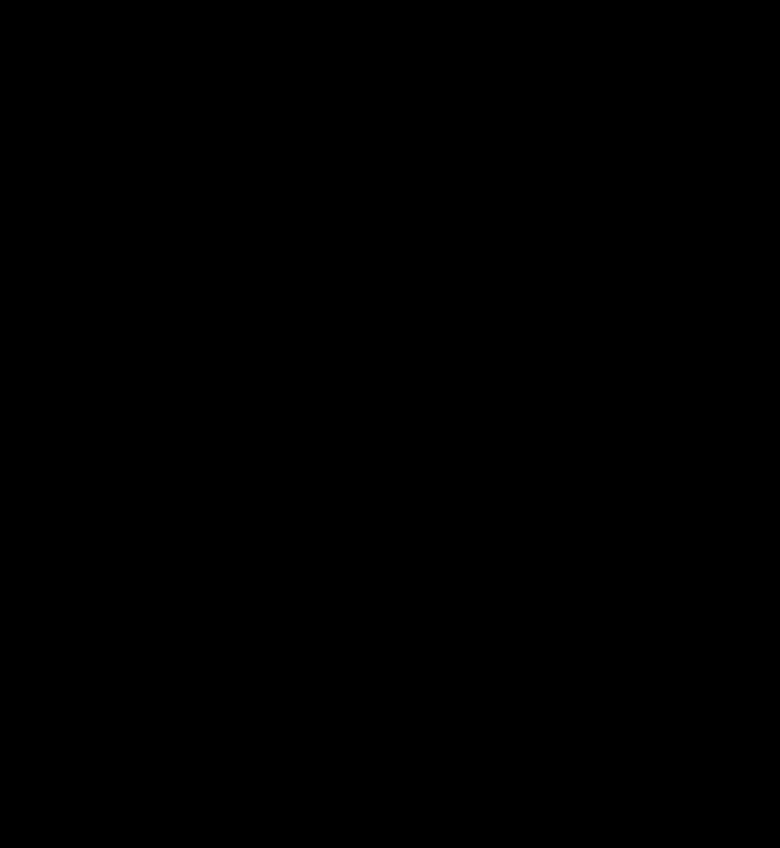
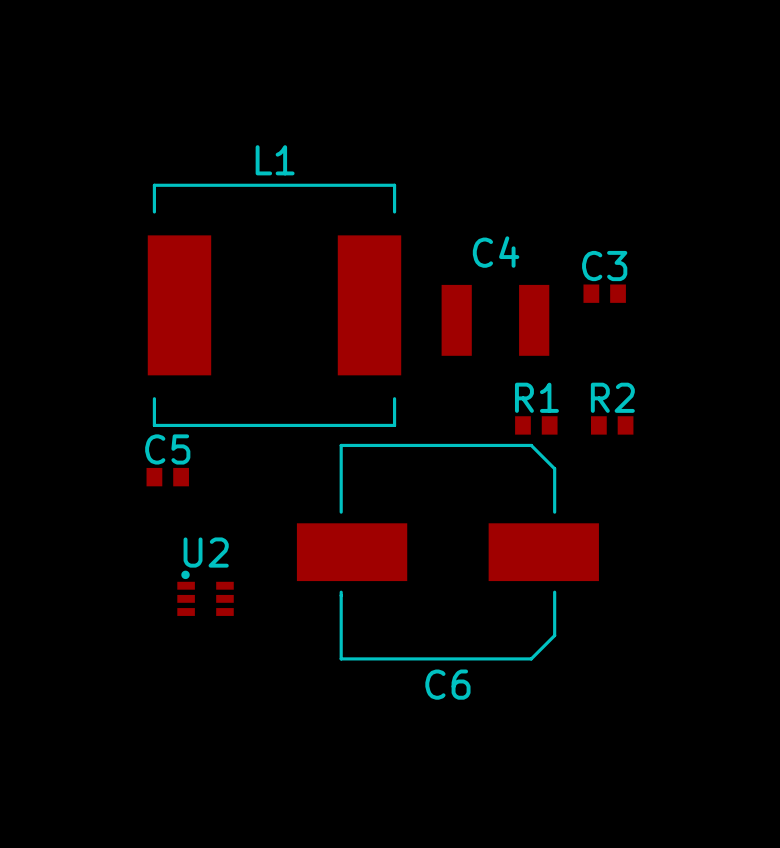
C3: none -> (604, 293)
L1: none -> (274, 305)
C4: none -> (495, 320)
R1: none -> (536, 425)
R2: none -> (612, 425)
C5: none -> (167, 477)
C6: none -> (447, 552)
U2: none -> (205, 593)

